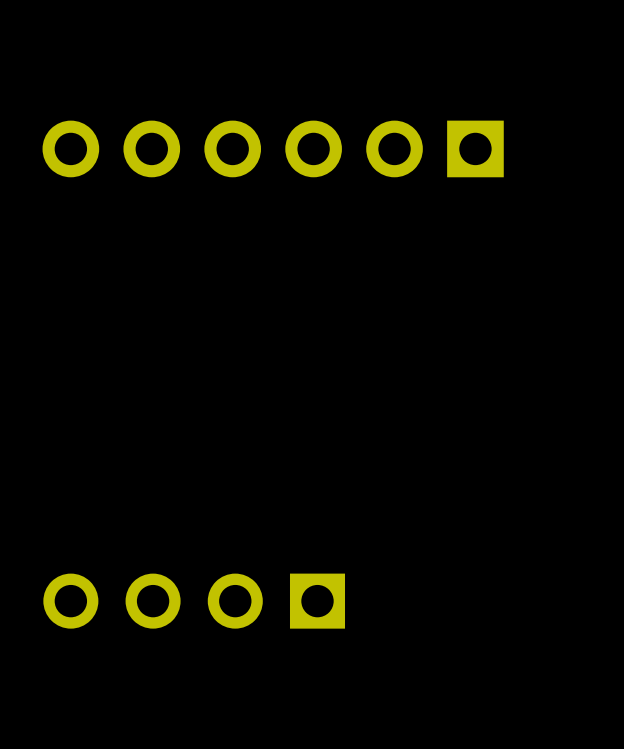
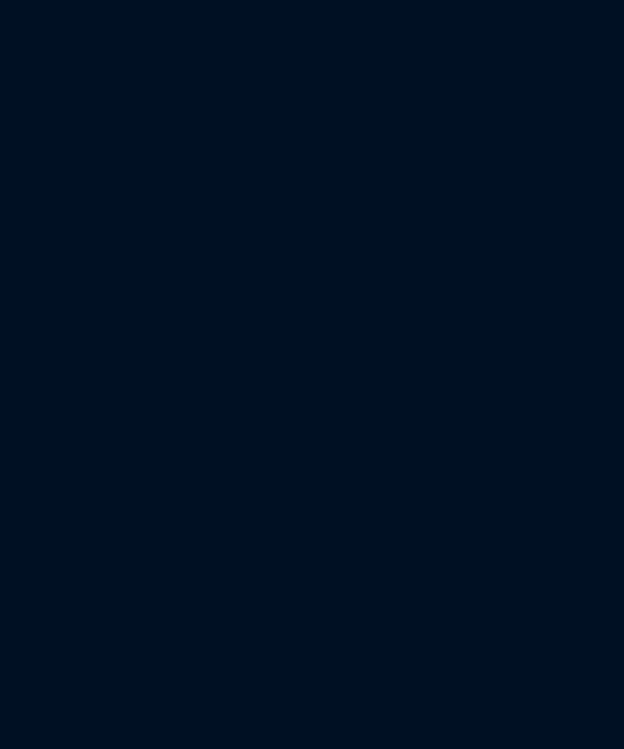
part: (273, 148) -> none
part: (194, 601) -> none

